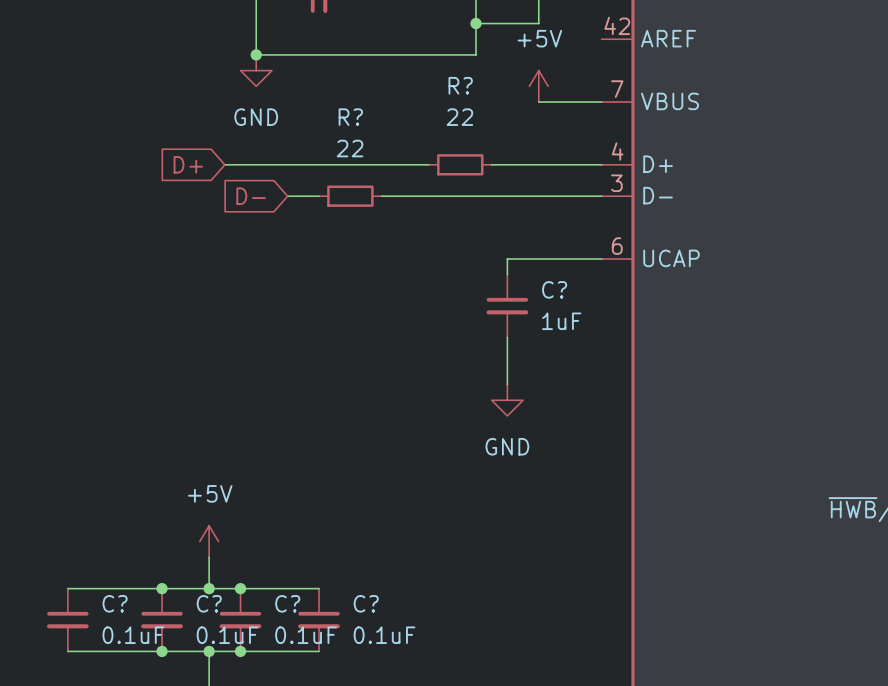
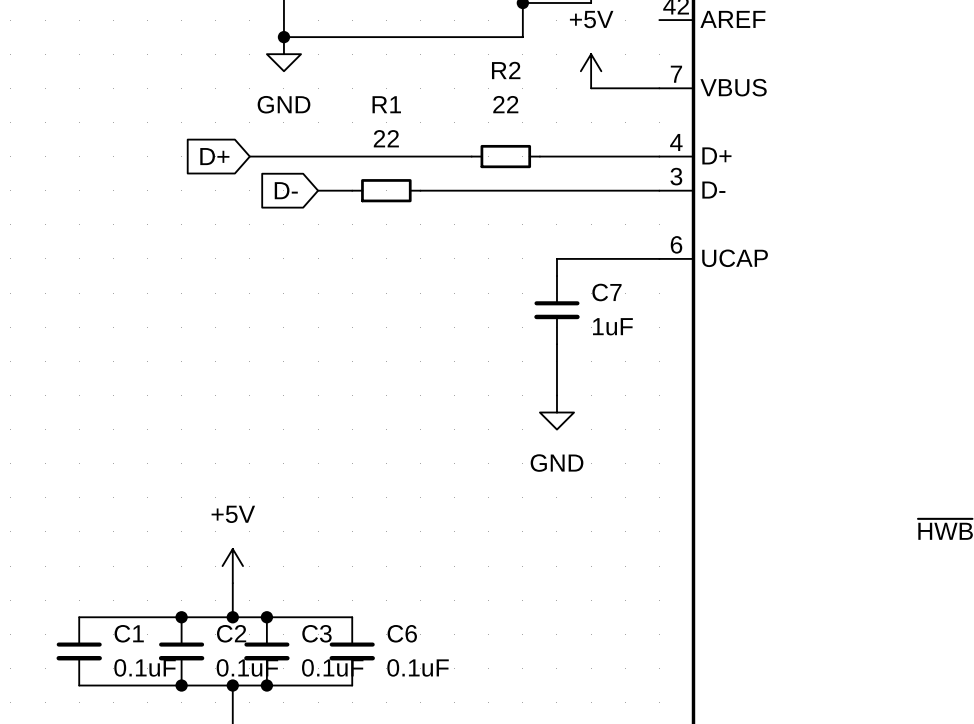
R? name: R? (460, 85) -> R2 (506, 70)
R? name: R? (350, 117) -> R1 (386, 104)
C? name: C? (554, 289) -> C7 (606, 292)
C? name: C? (115, 603) -> C1 (129, 633)
C? name: C? (209, 603) -> C2 (231, 633)
C? name: C? (287, 603) -> C3 (316, 633)
C? name: C? (366, 603) -> C6 (402, 633)

